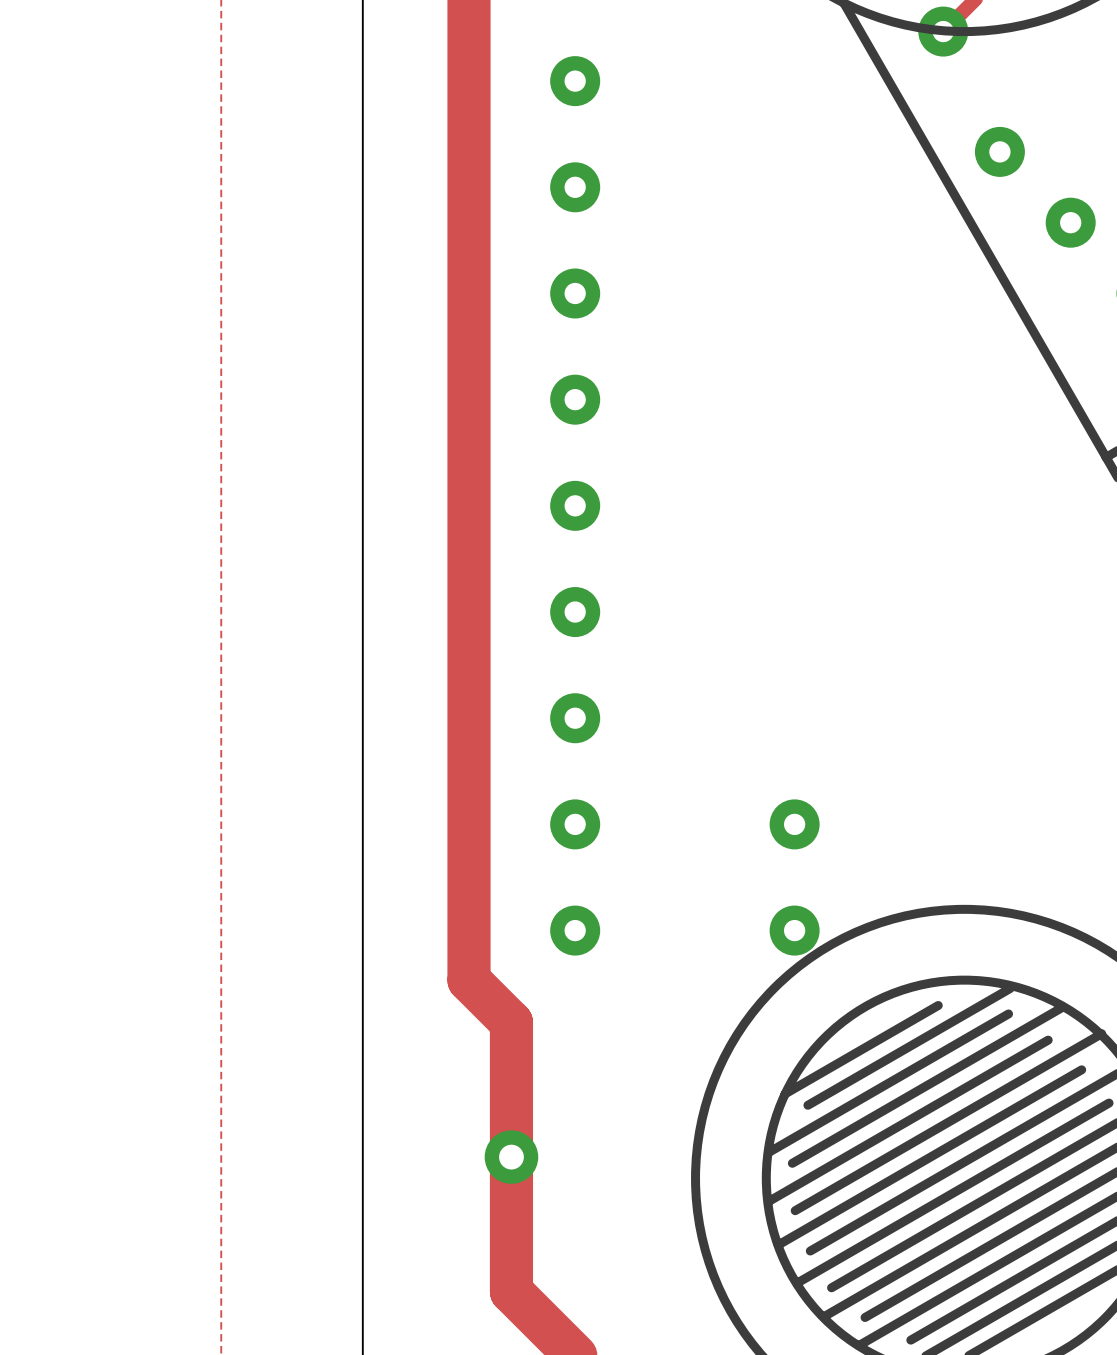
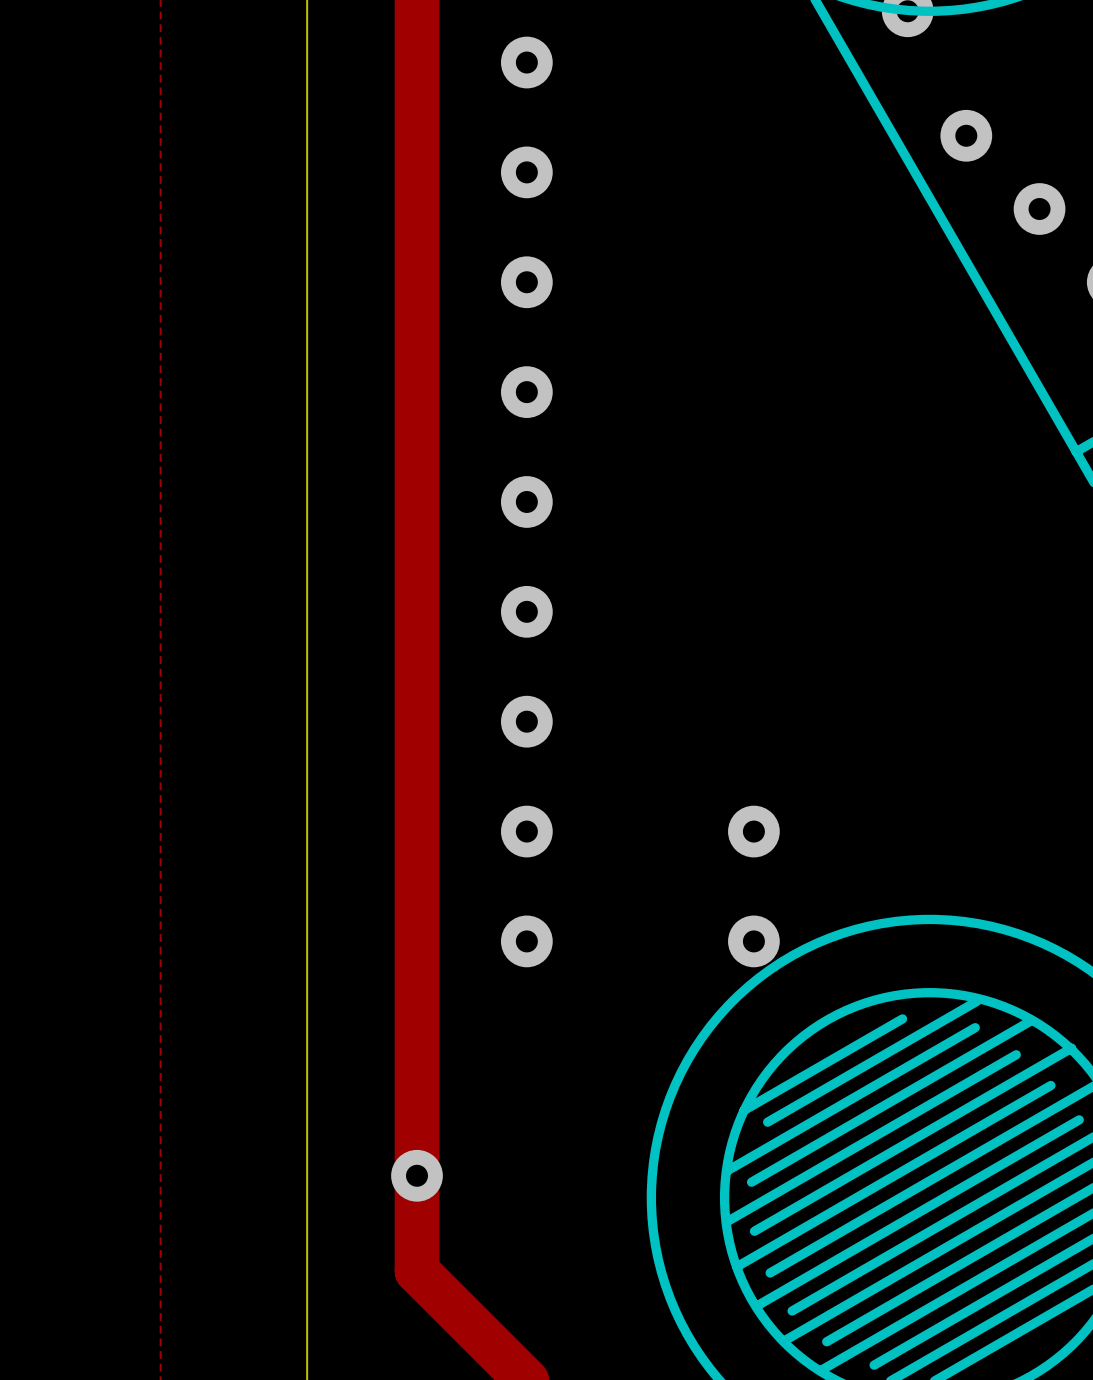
track: (468, 980) (511, 1022) (511, 1291) -> (417, 992) (417, 1271) (460, 1314)
via position: (511, 1157) -> (417, 1175)

